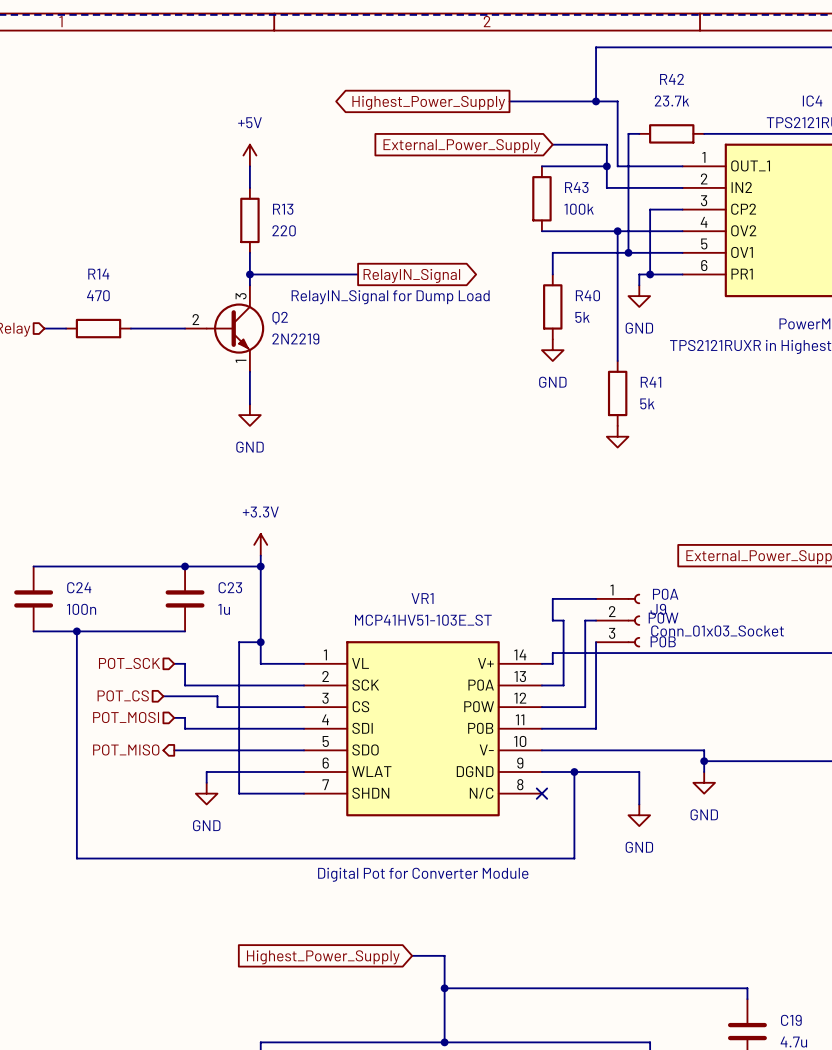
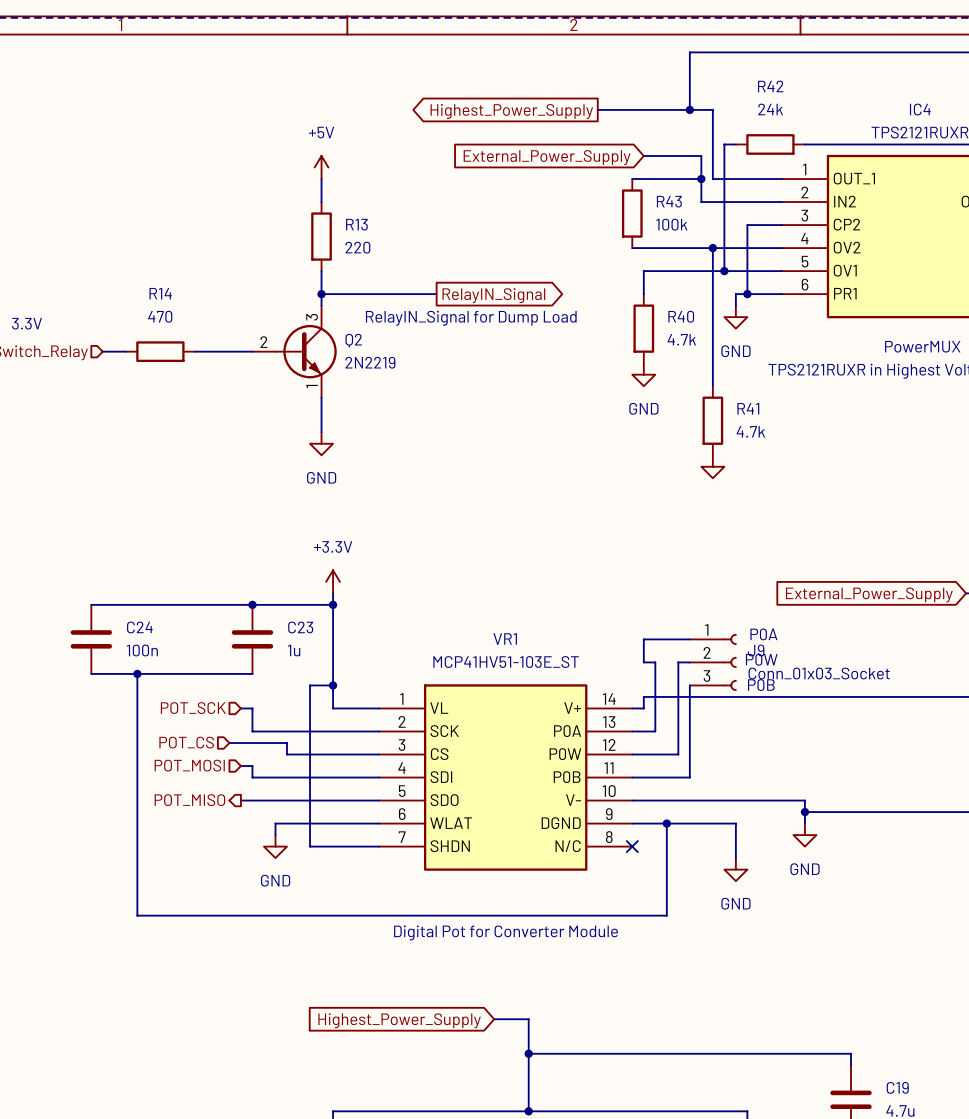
R42 value: 23.7k (671, 101) -> 24k (770, 109)
R40 value: 5k (582, 317) -> 4.7k (681, 339)
R41 value: 5k (647, 403) -> 4.7k (750, 431)

